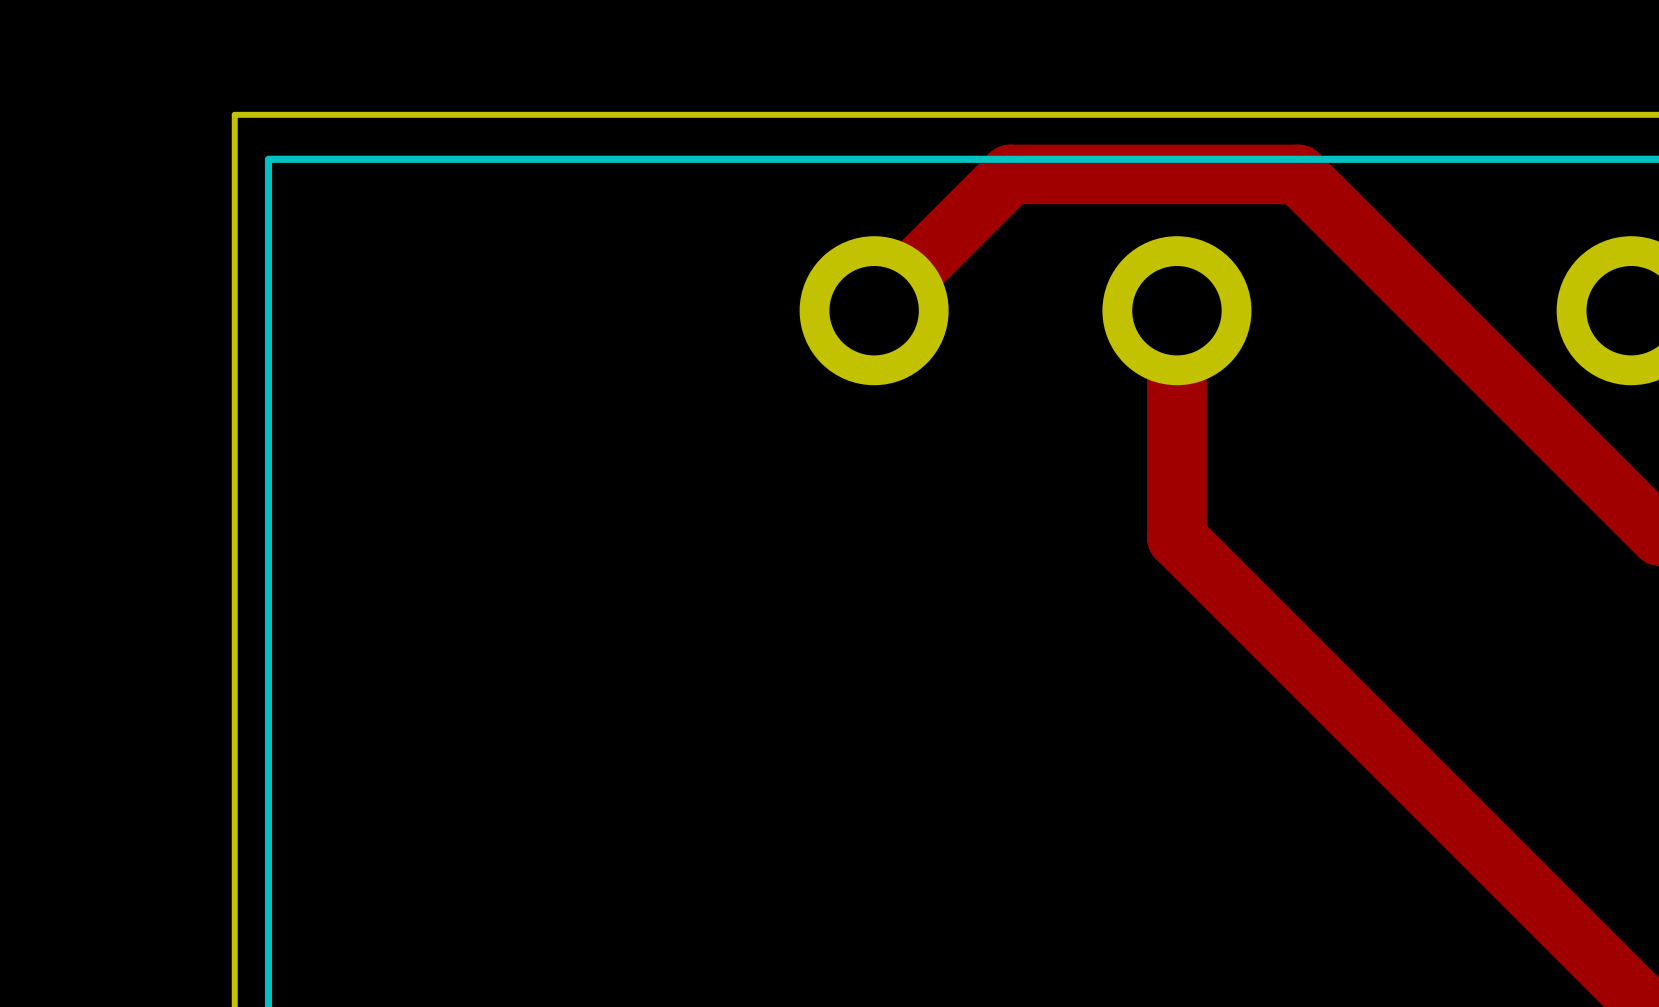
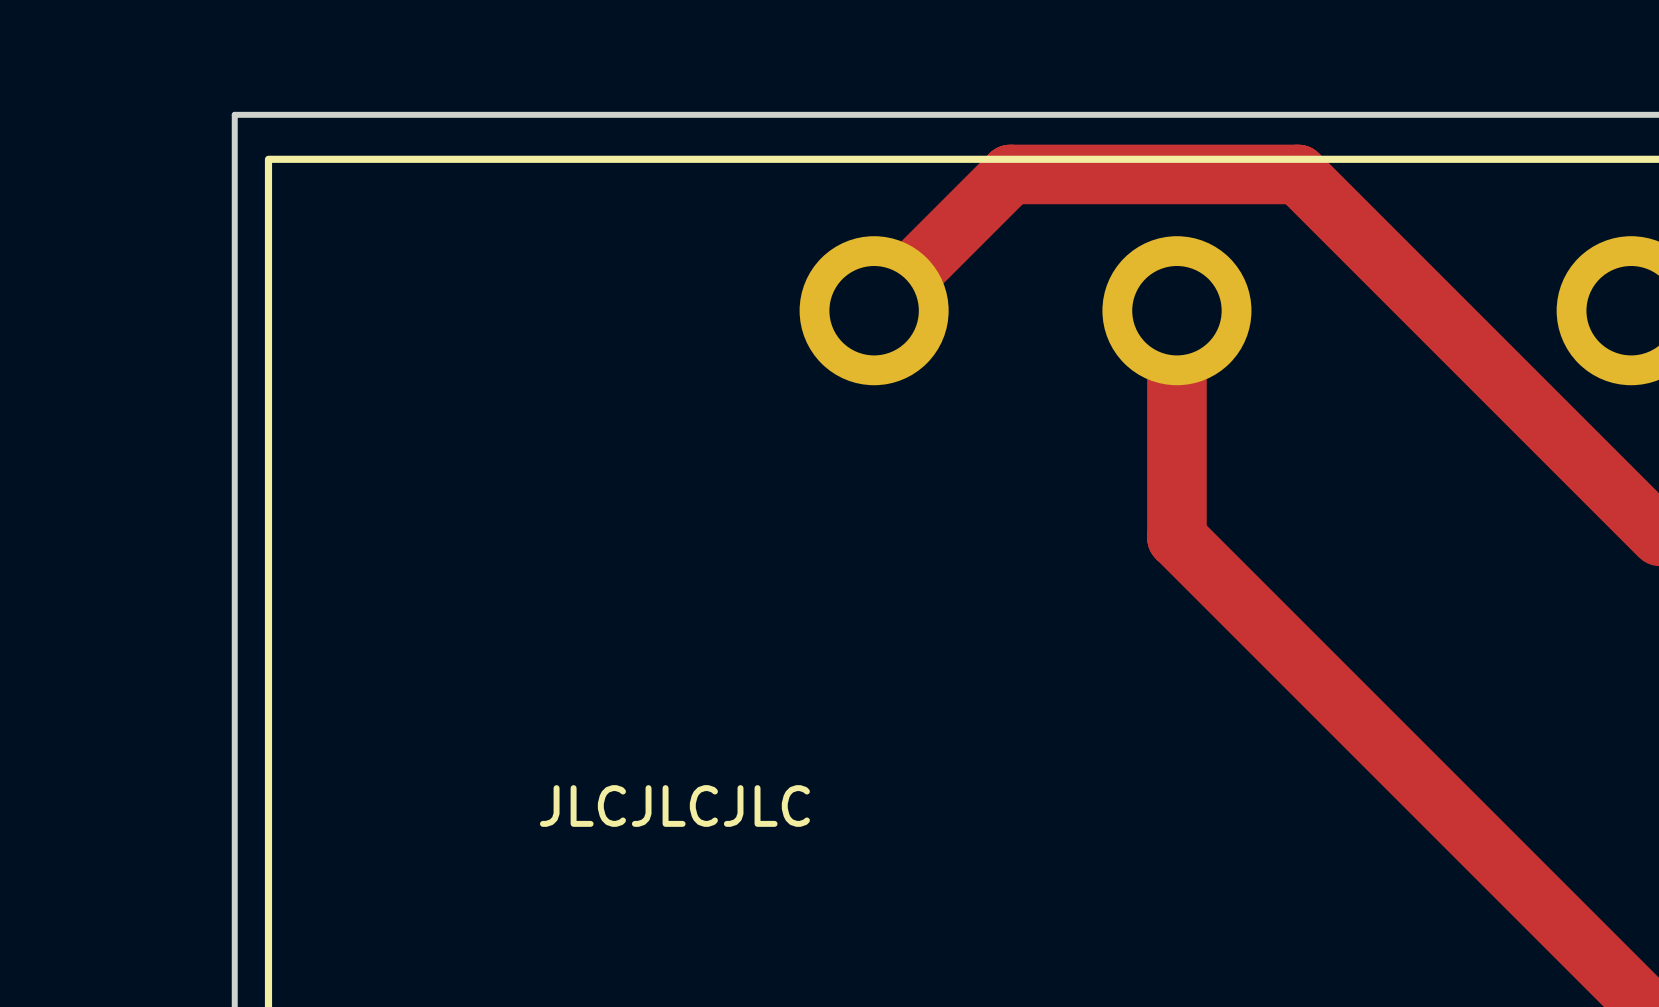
text: none -> JLCJLCJLC (674, 805)

